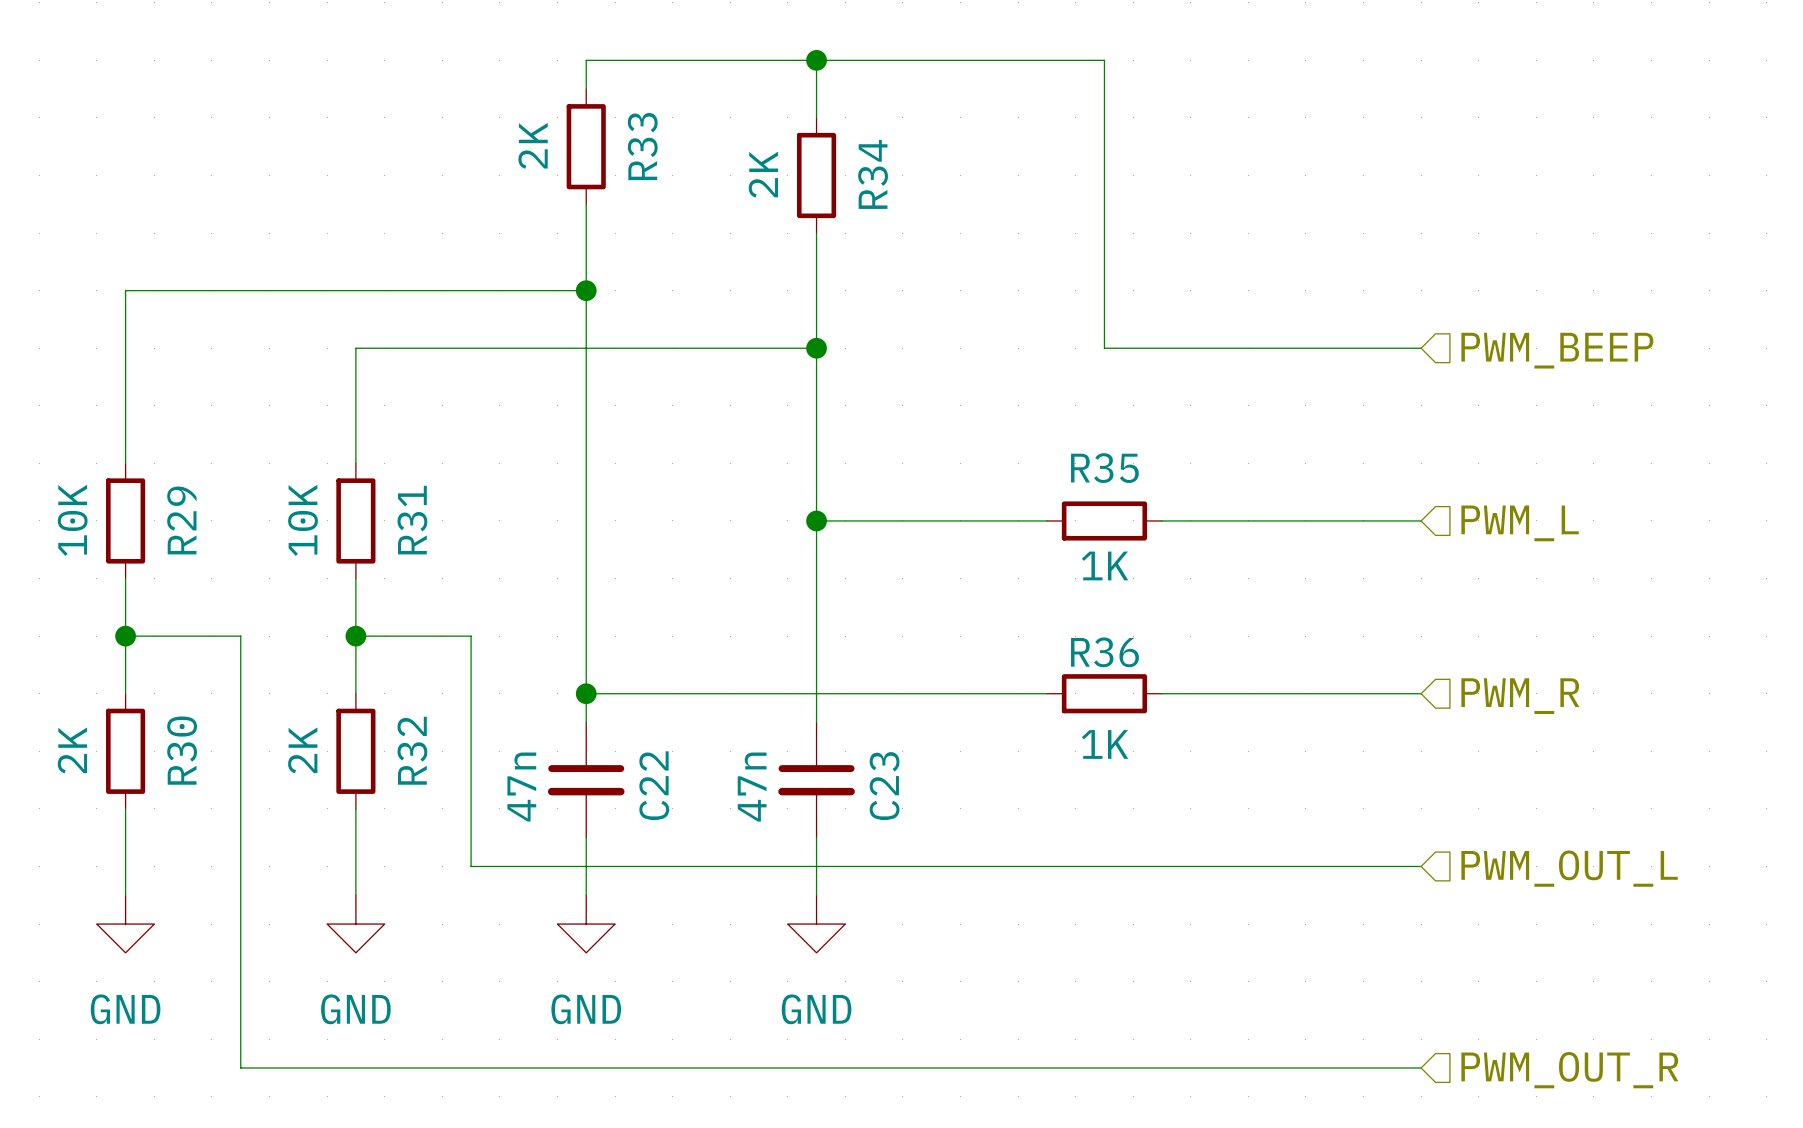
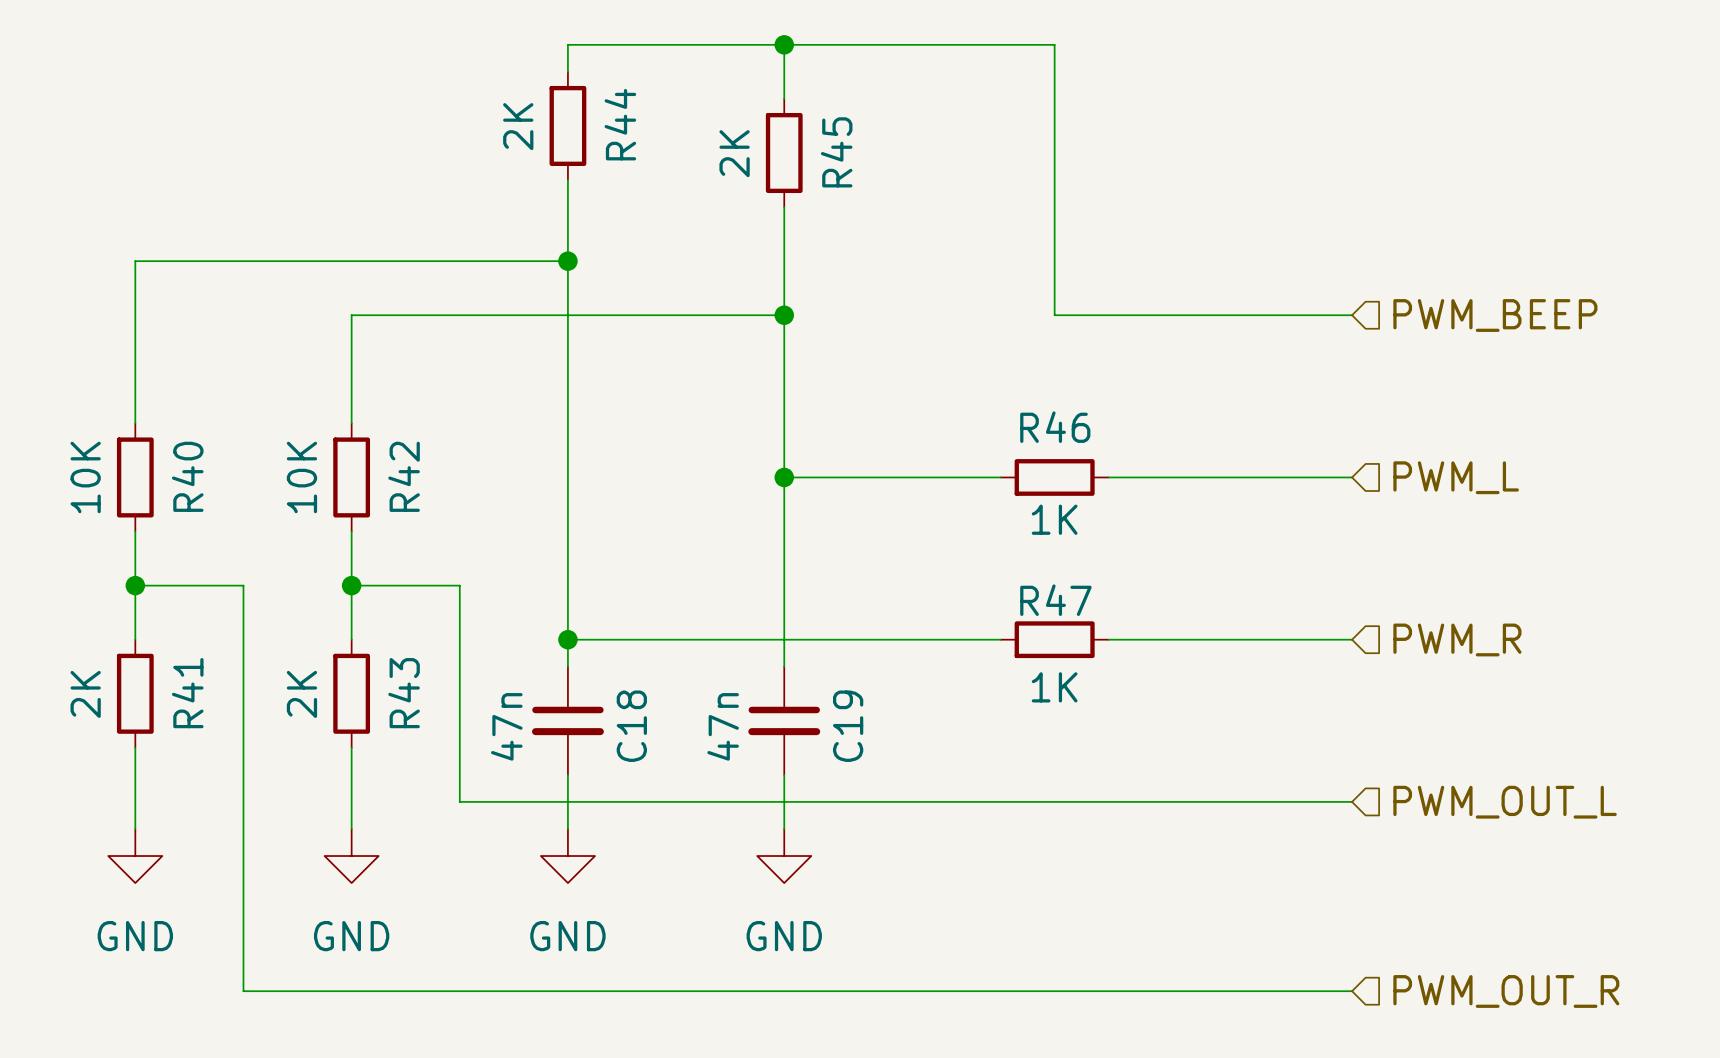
R33 name: R33 (642, 146) -> R44 (620, 124)
R34 name: R34 (873, 174) -> R45 (836, 152)
R35 name: R35 (1104, 468) -> R46 (1055, 427)
R29 name: R29 (181, 520) -> R40 (187, 476)
R31 name: R31 (412, 520) -> R42 (404, 476)
R36 name: R36 (1104, 652) -> R47 (1055, 600)
R30 name: R30 (182, 750) -> R41 (187, 693)
R32 name: R32 (412, 750) -> R43 (404, 693)
C22 name: C22 (654, 785) -> C18 (631, 726)
C23 name: C23 (884, 786) -> C19 (848, 726)

